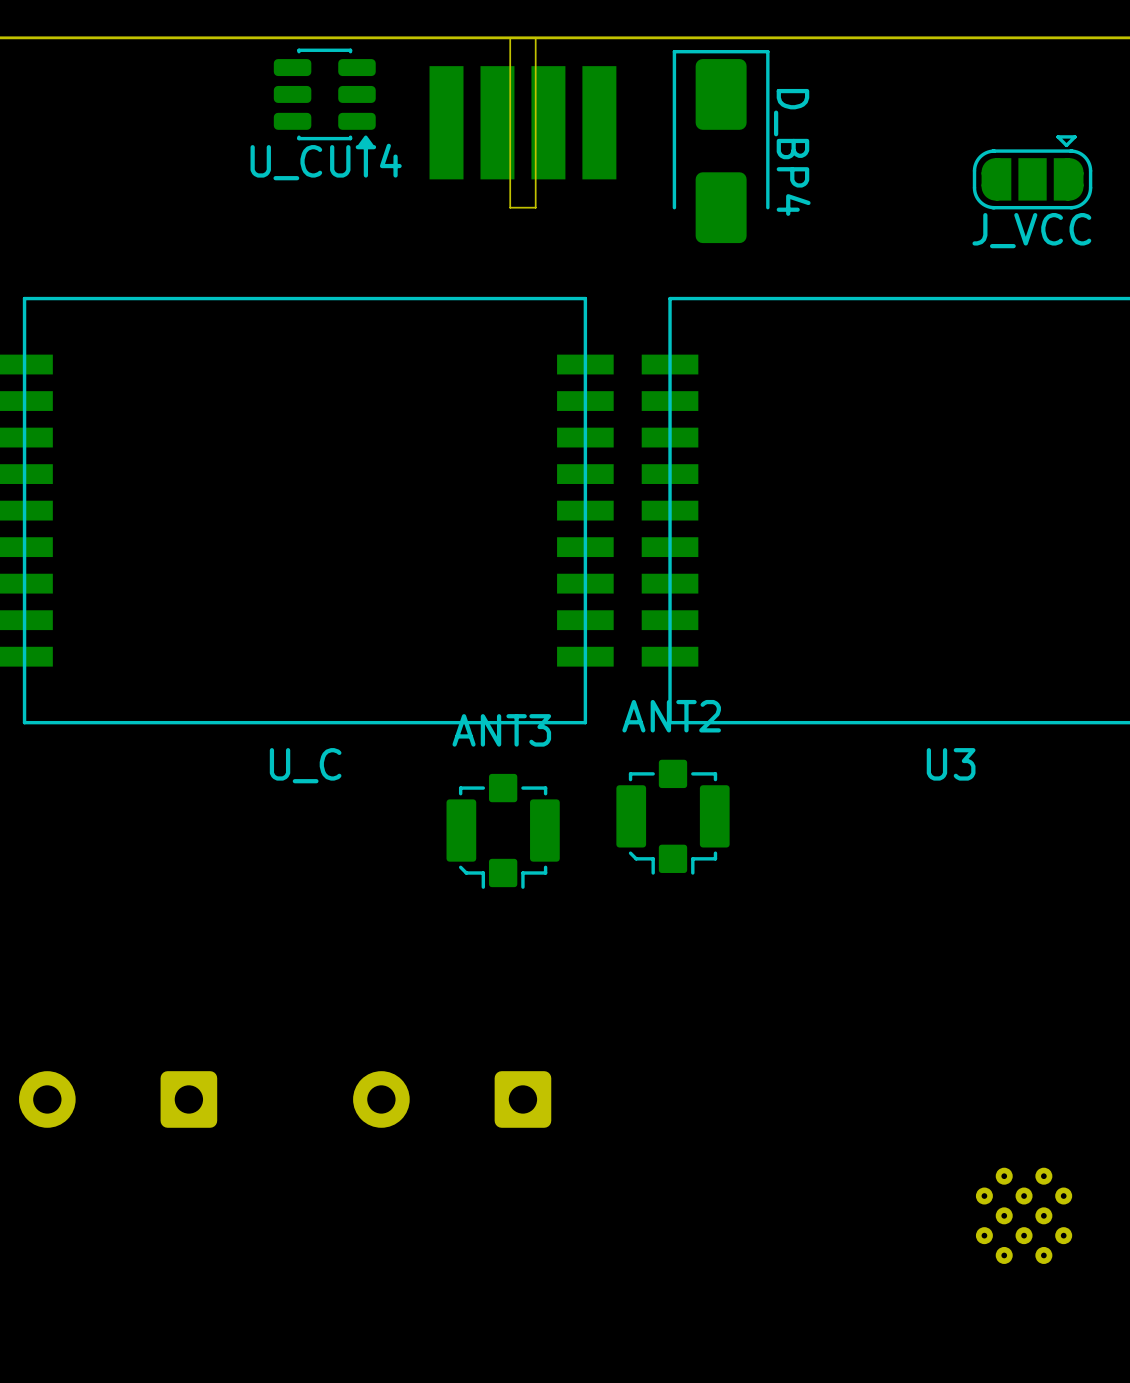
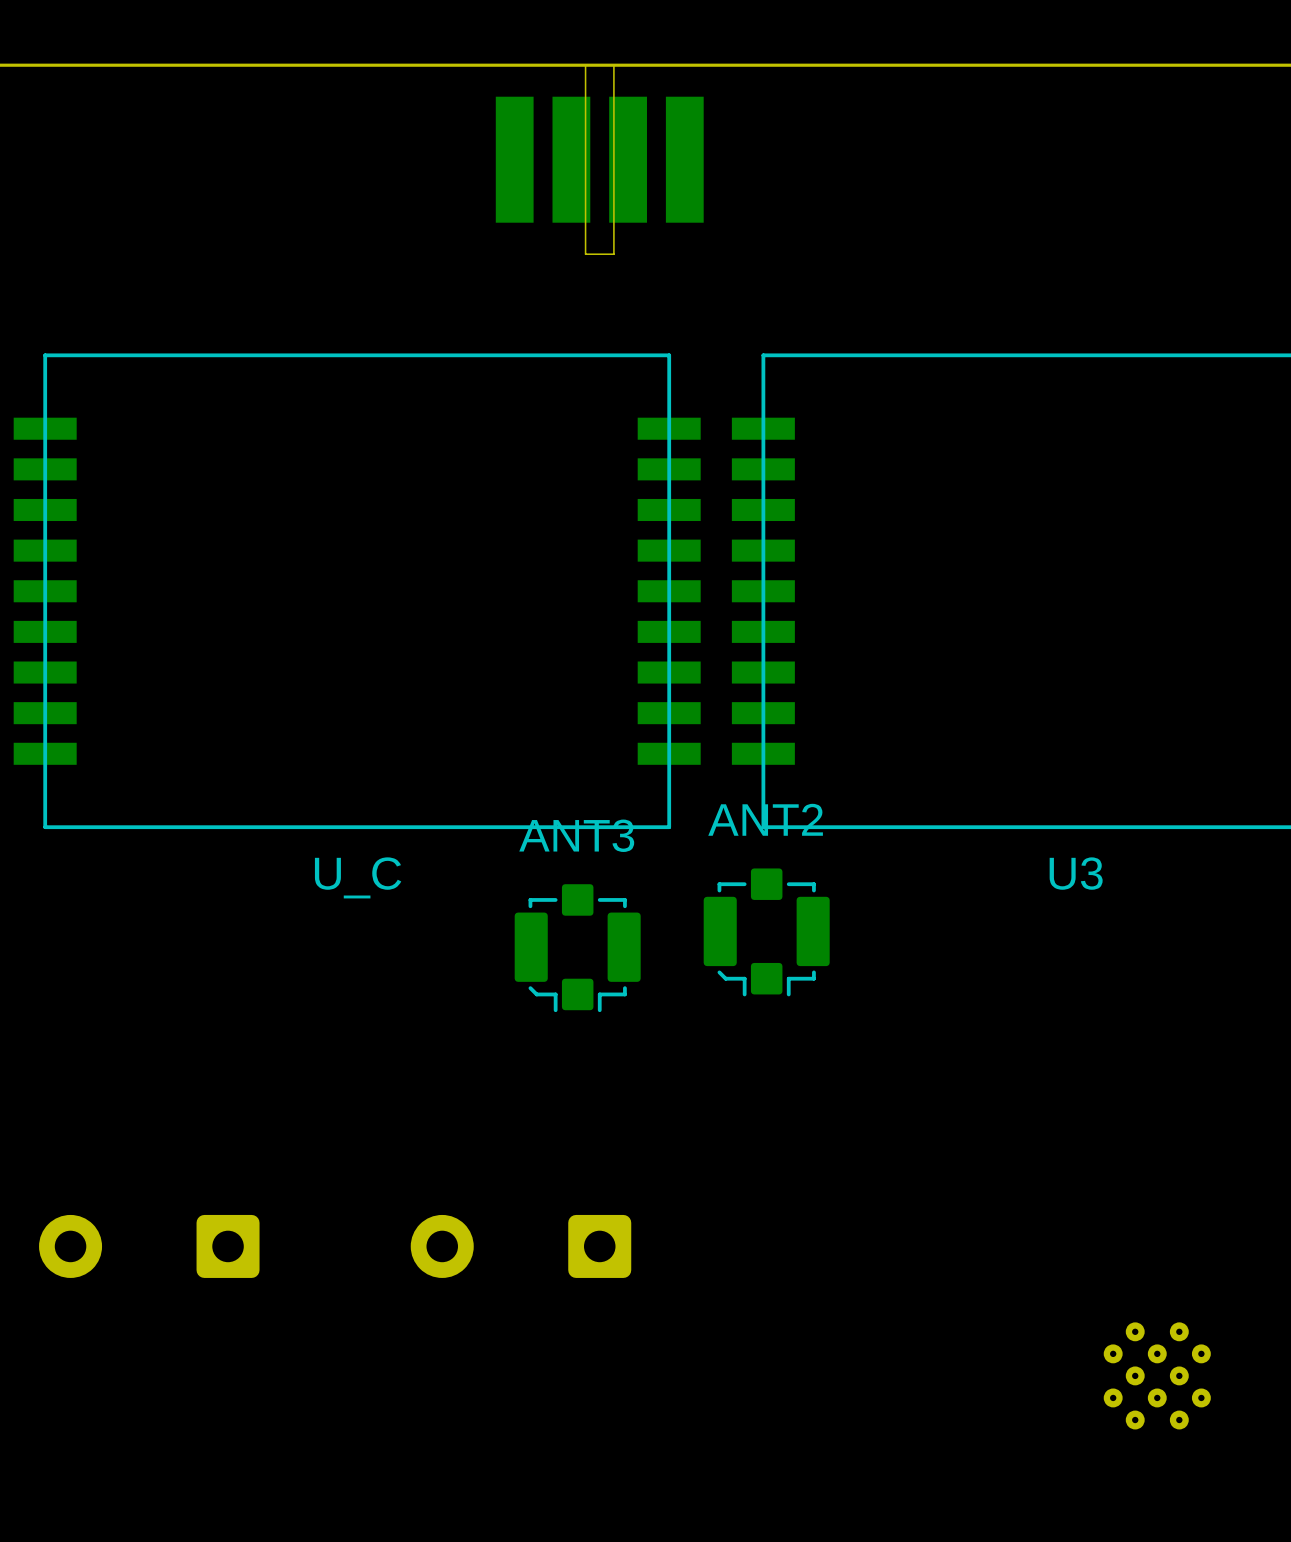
U_CUT4: (324, 98) -> none
D_BP4: (721, 146) -> none
J_VCC: (1032, 172) -> none

